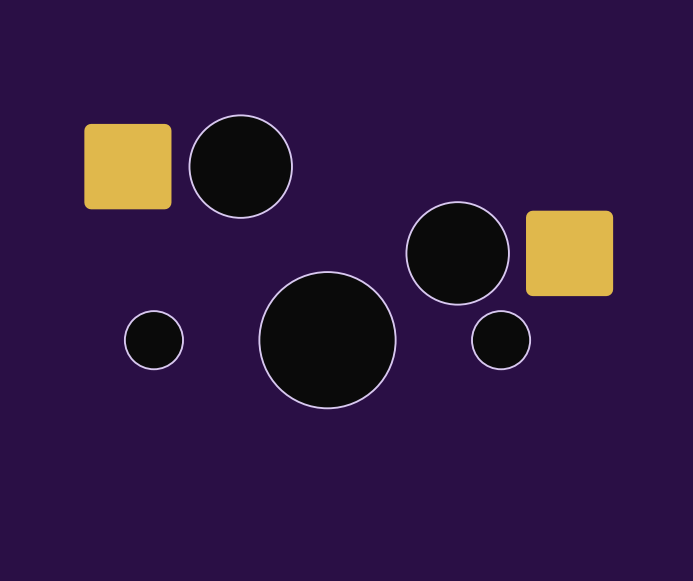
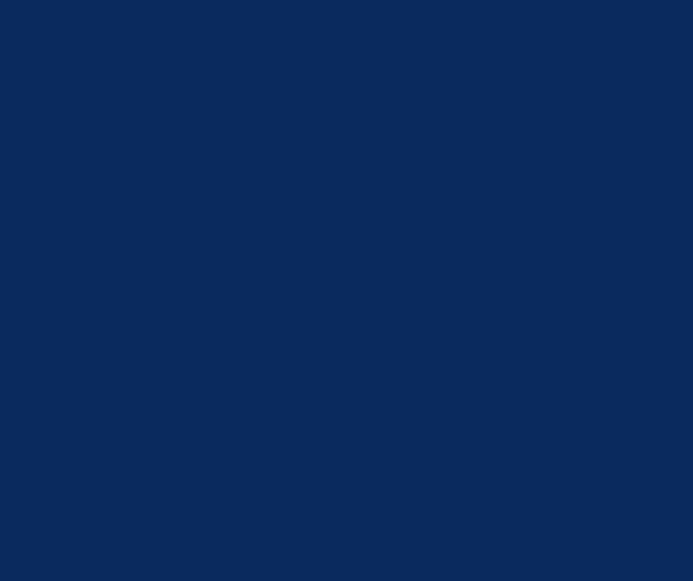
part: (348, 261) -> none

